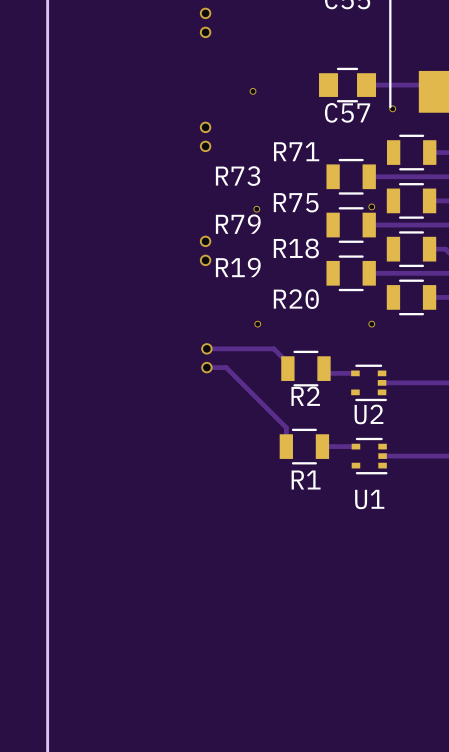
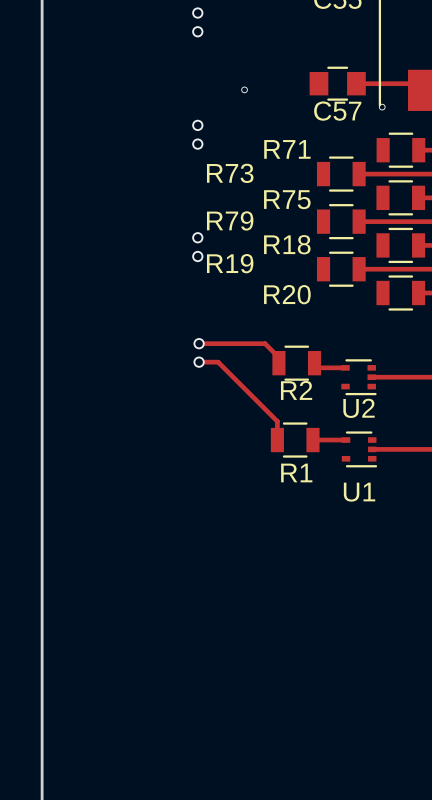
via: (371, 206) -> none
via: (256, 209) -> none
via: (257, 324) -> none
via: (371, 324) -> none

